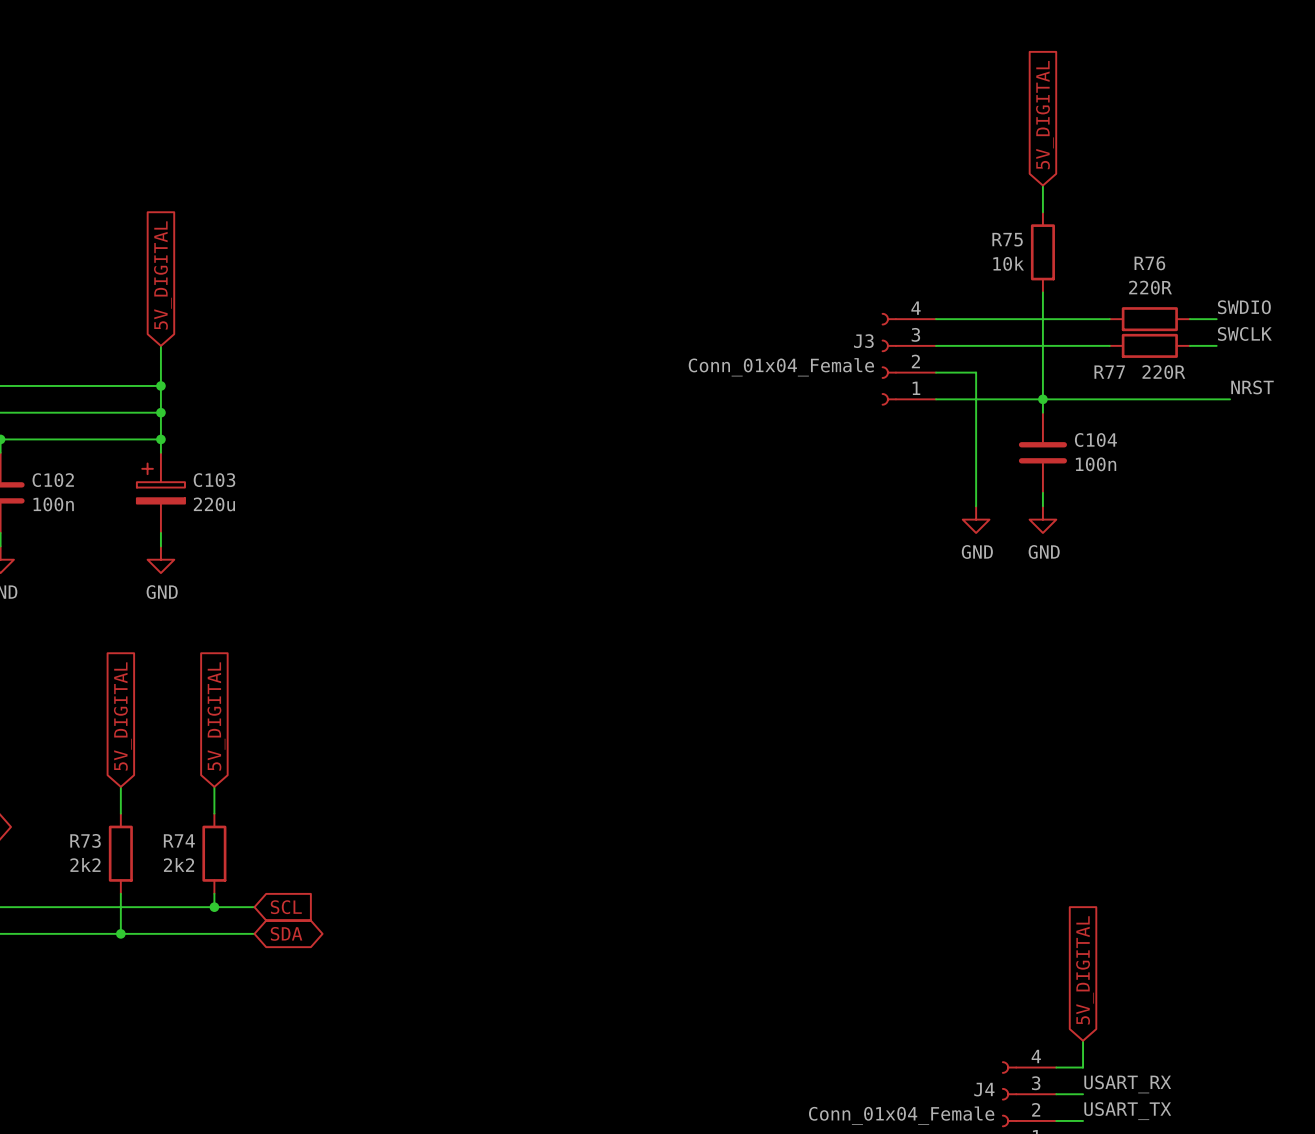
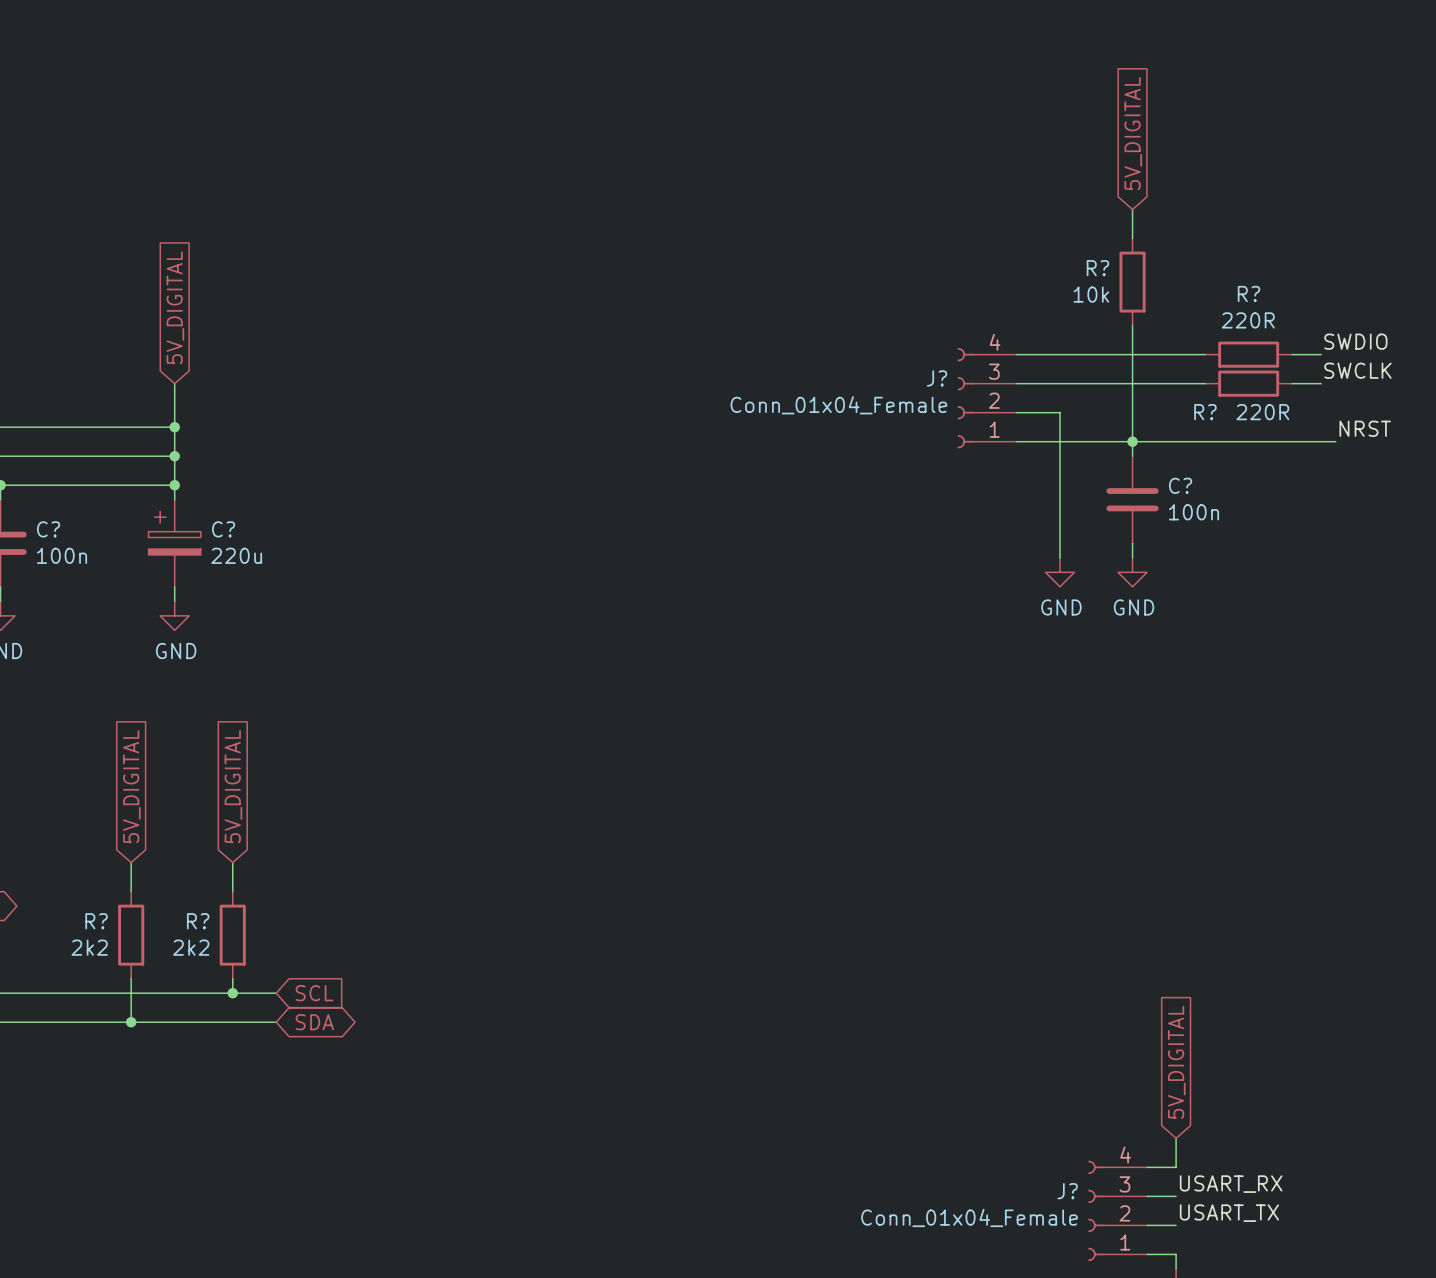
R75 name: R75 (1007, 239) -> R? (1097, 268)
R76 name: R76 (1149, 263) -> R? (1249, 294)
J3 name: J3 (863, 341) -> J? (937, 378)
R77 name: R77 (1109, 372) -> R? (1205, 412)
C104 name: C104 (1095, 440) -> C? (1180, 485)
C102 name: C102 (53, 480) -> C? (48, 529)
C103 name: C103 (214, 480) -> C? (223, 529)
R73 name: R73 (85, 840) -> R? (96, 921)
R74 name: R74 (179, 840) -> R? (198, 921)
J4 name: J4 (984, 1089) -> J? (1067, 1191)

